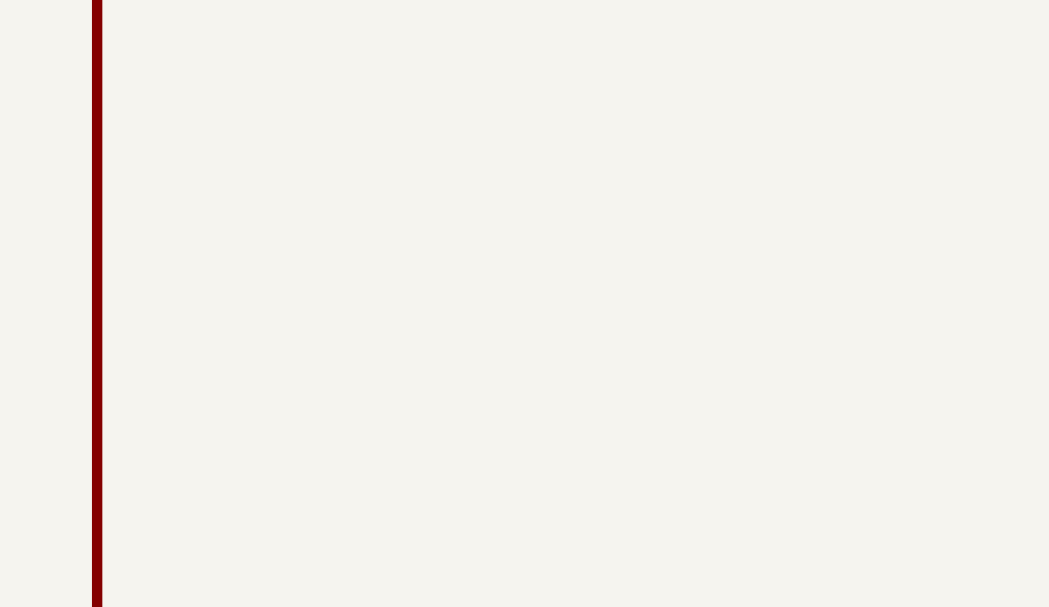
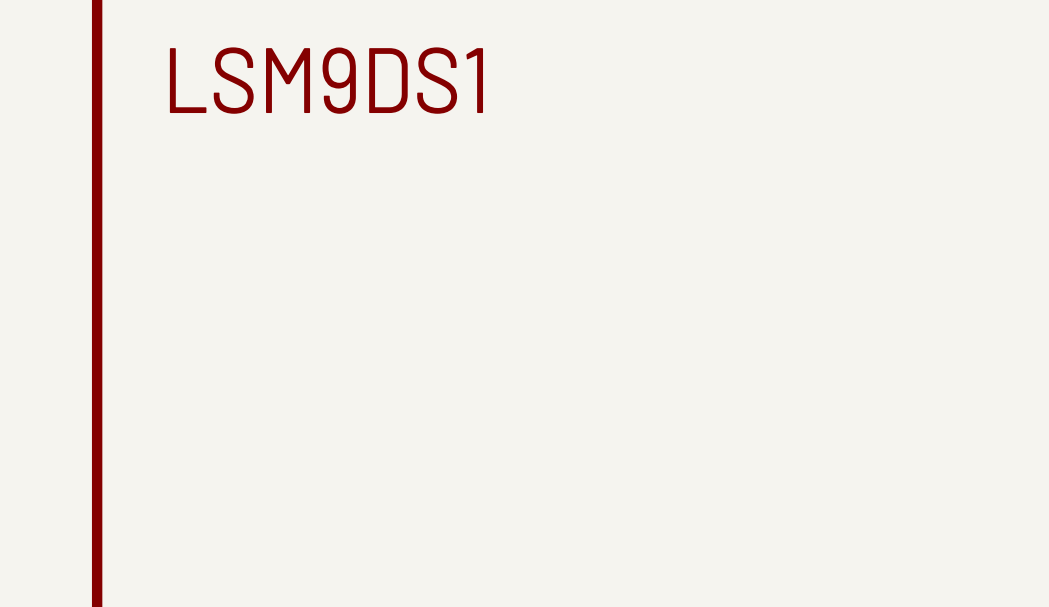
text: none -> LSM9DS1 (326, 80)

